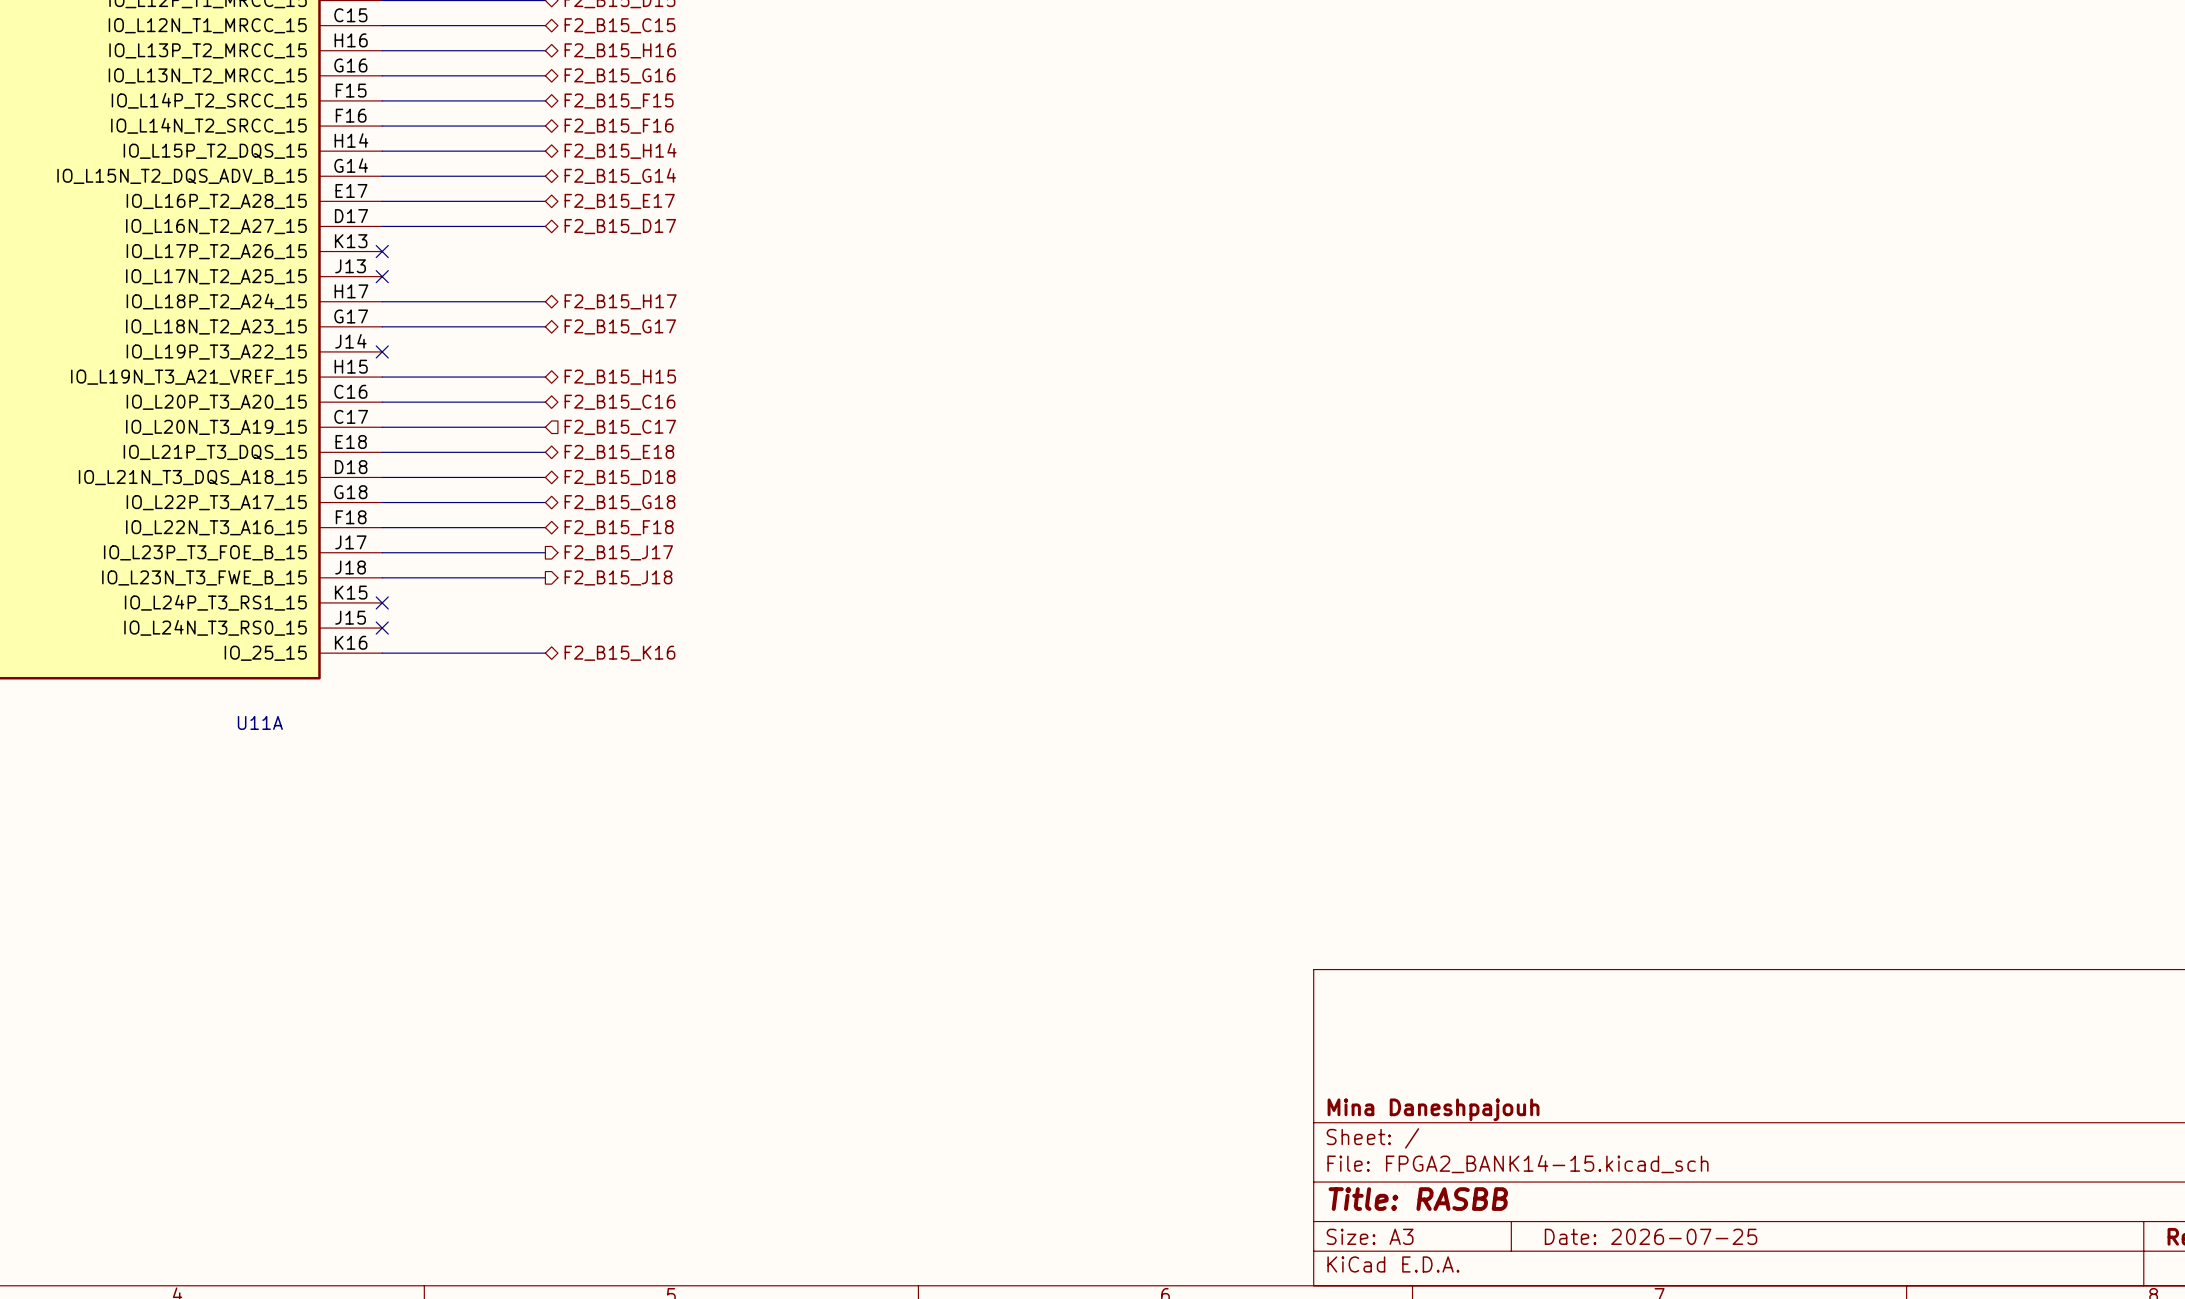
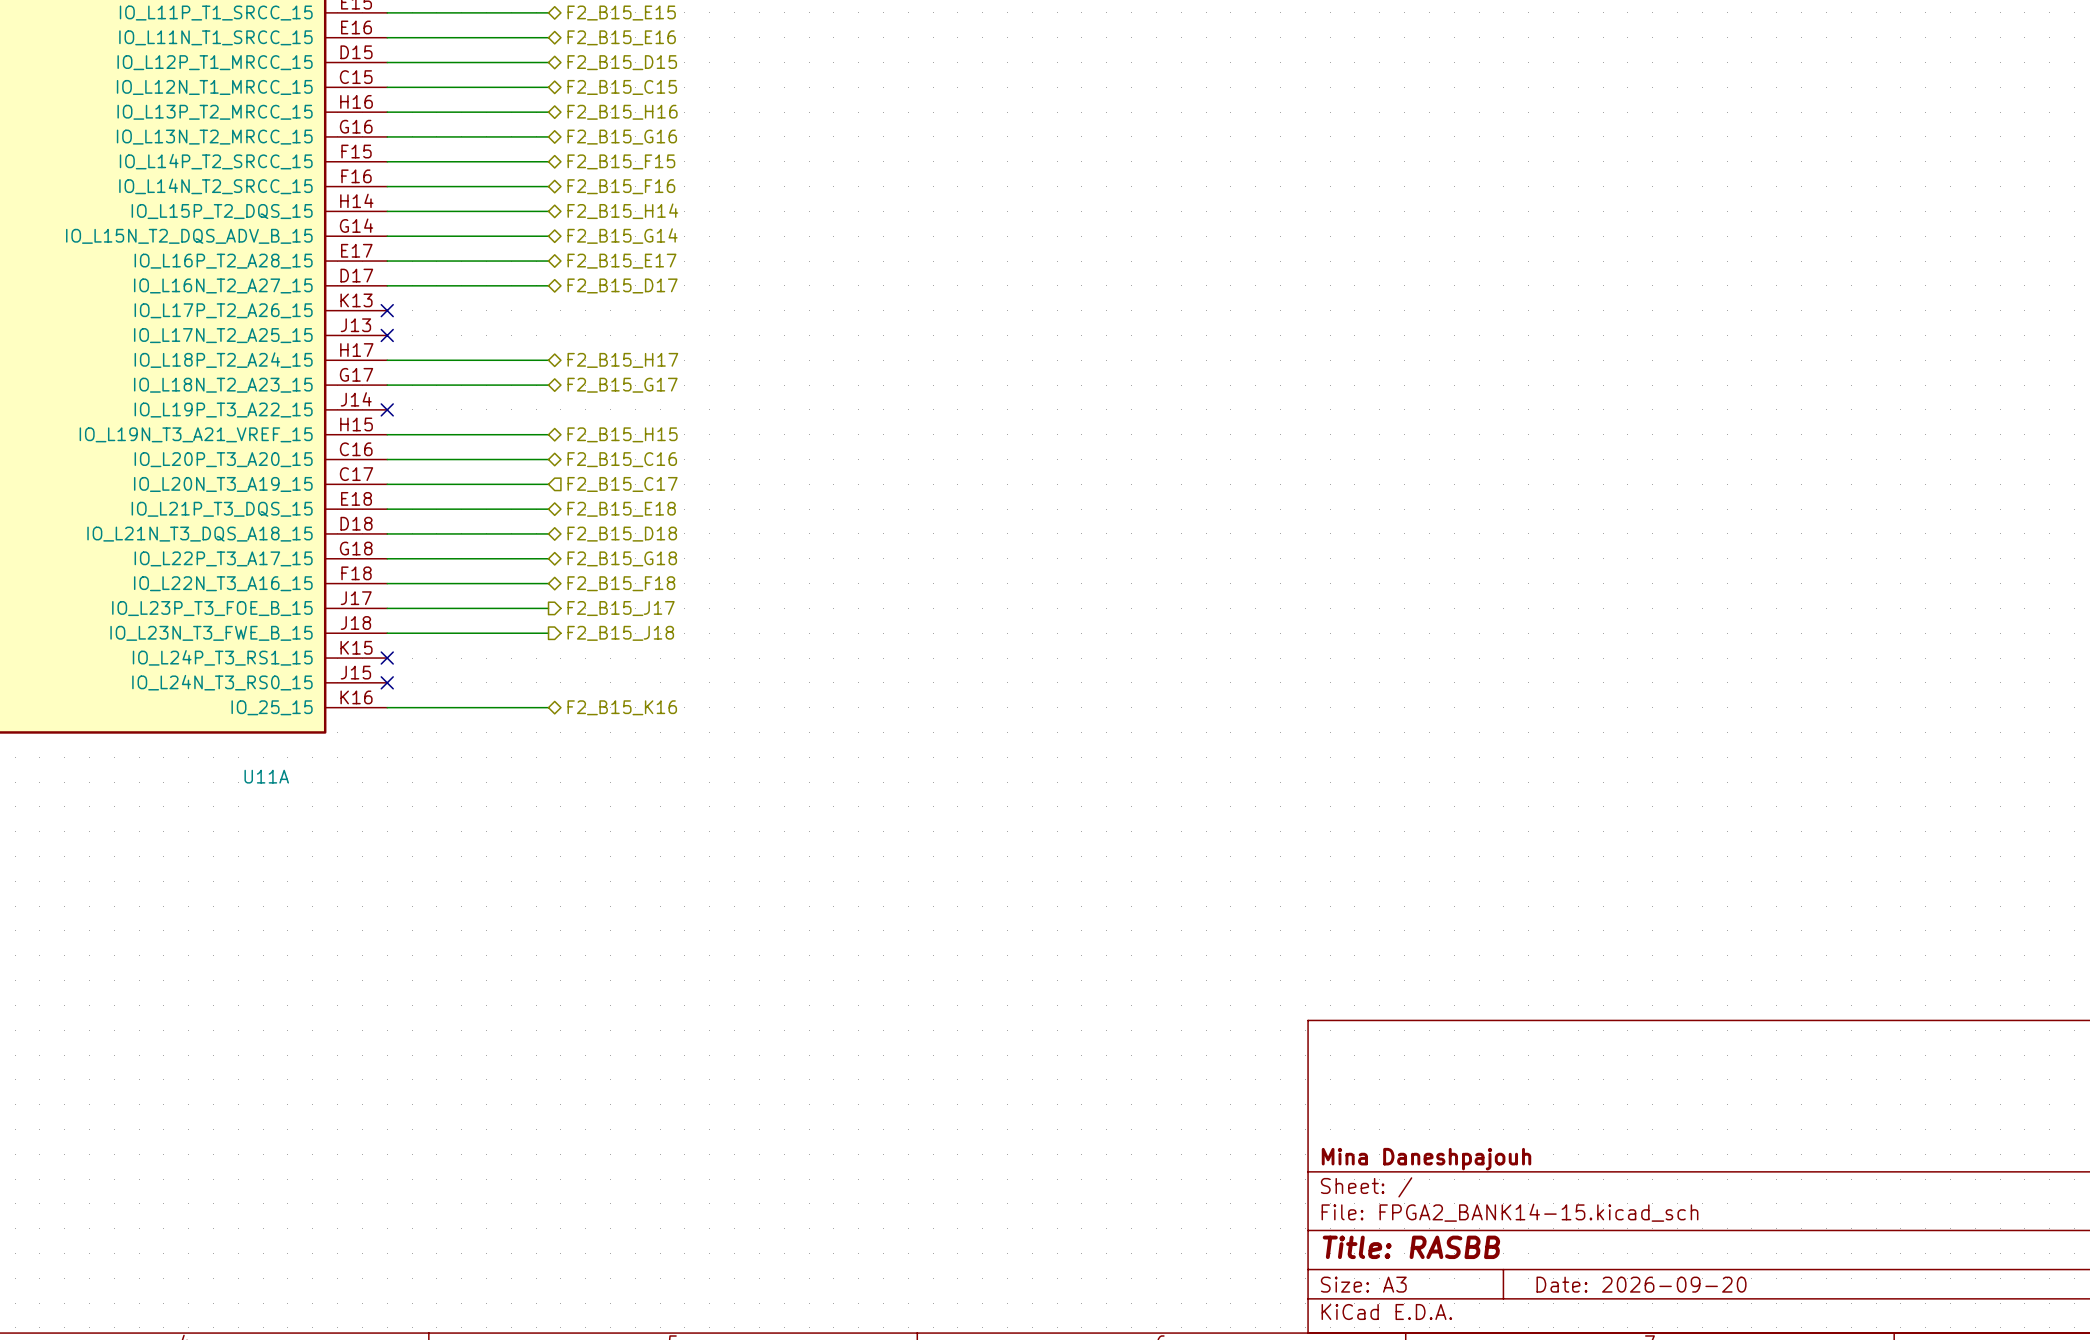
title block: Date: 2026-07-25 (1651, 1236) -> Date: 2026-09-20 (1641, 1284)

